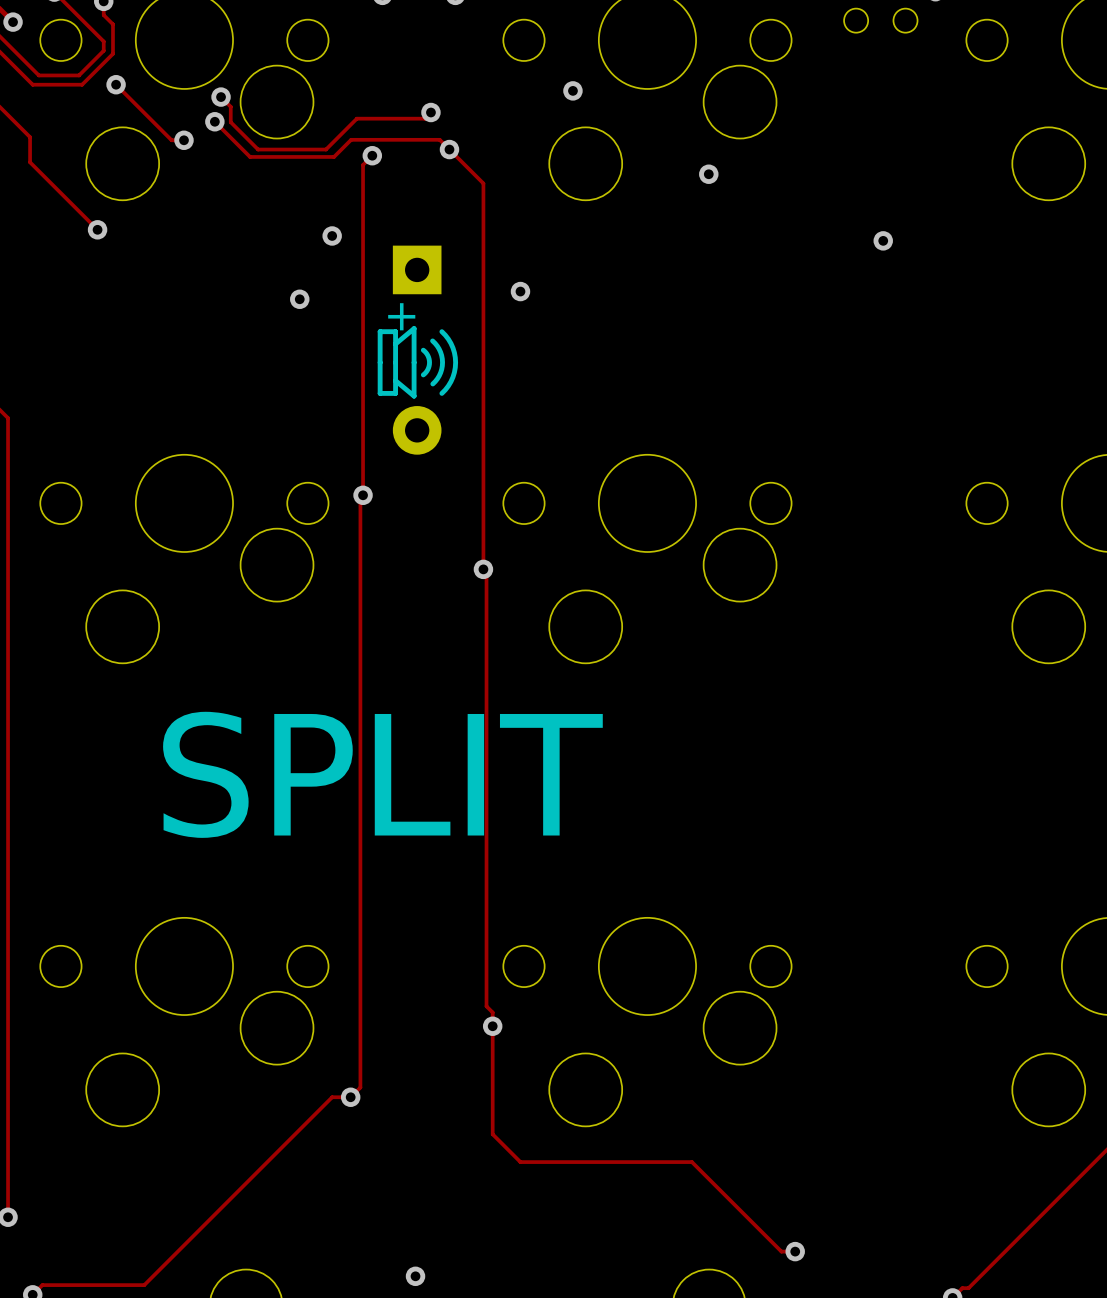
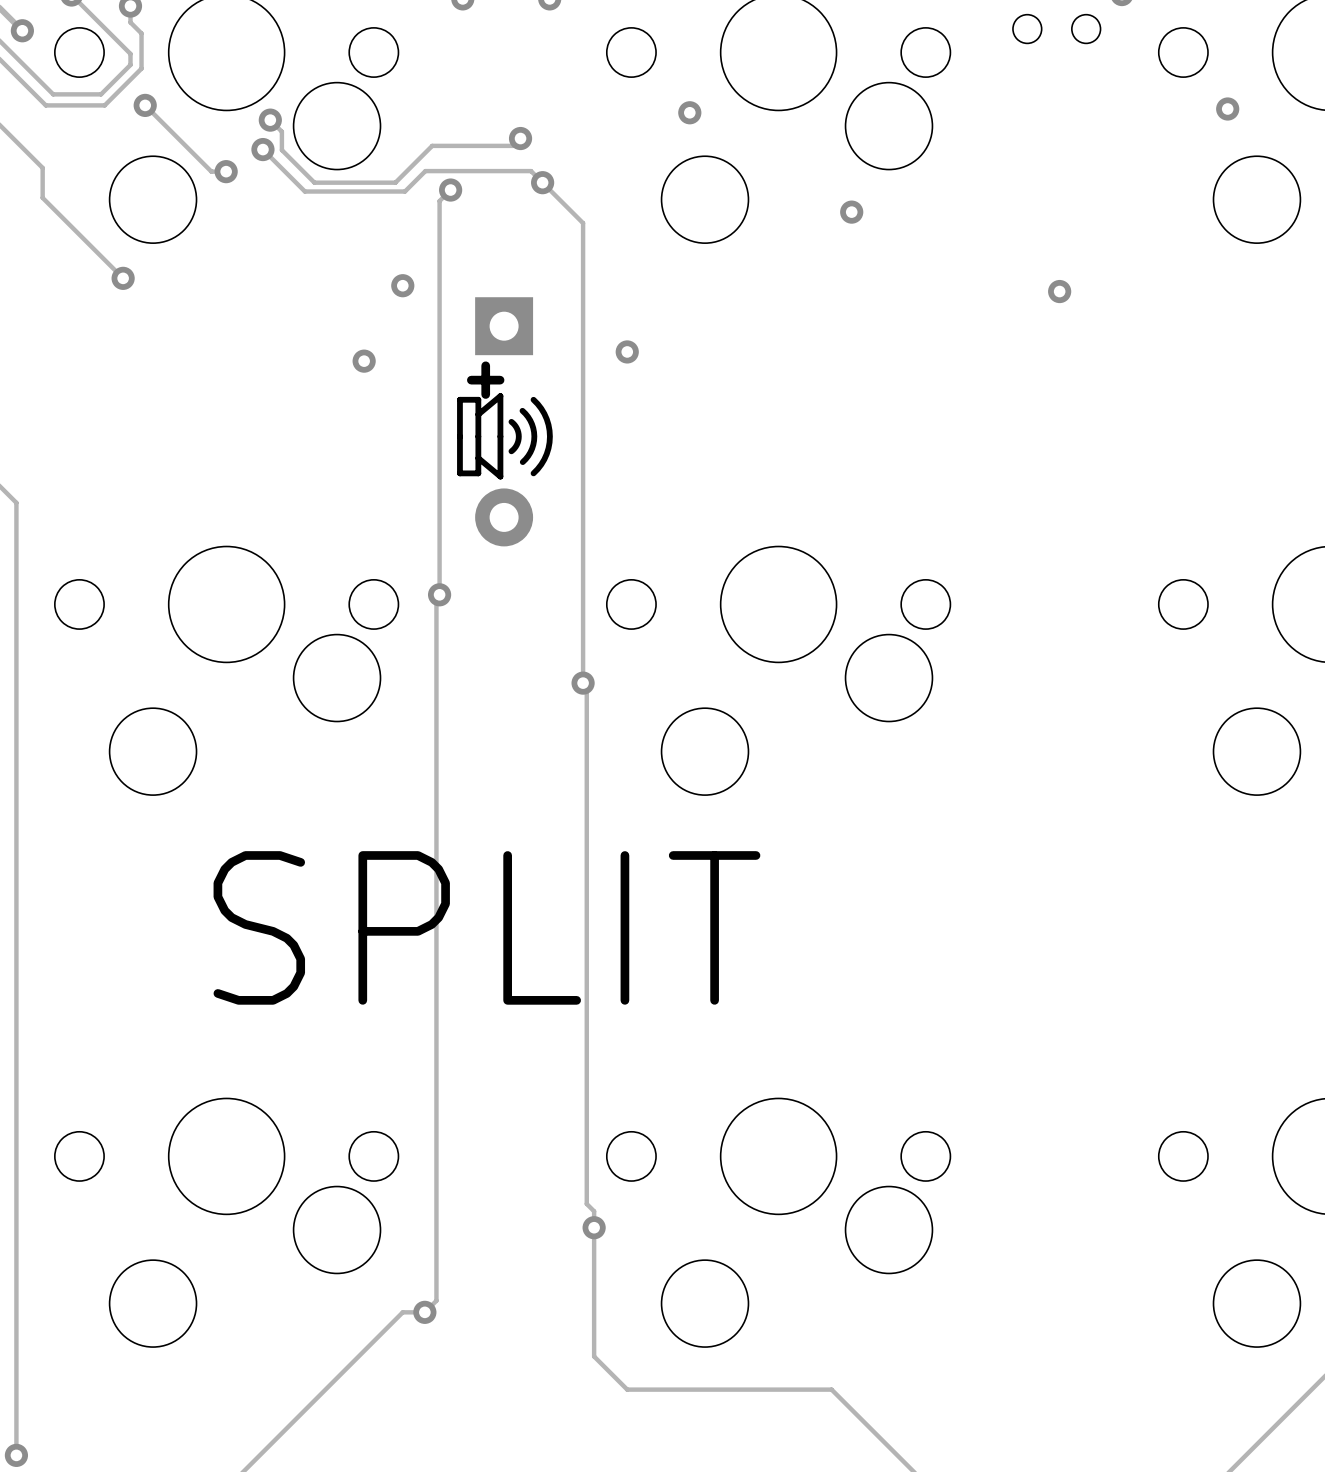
via: none -> (1227, 109)

